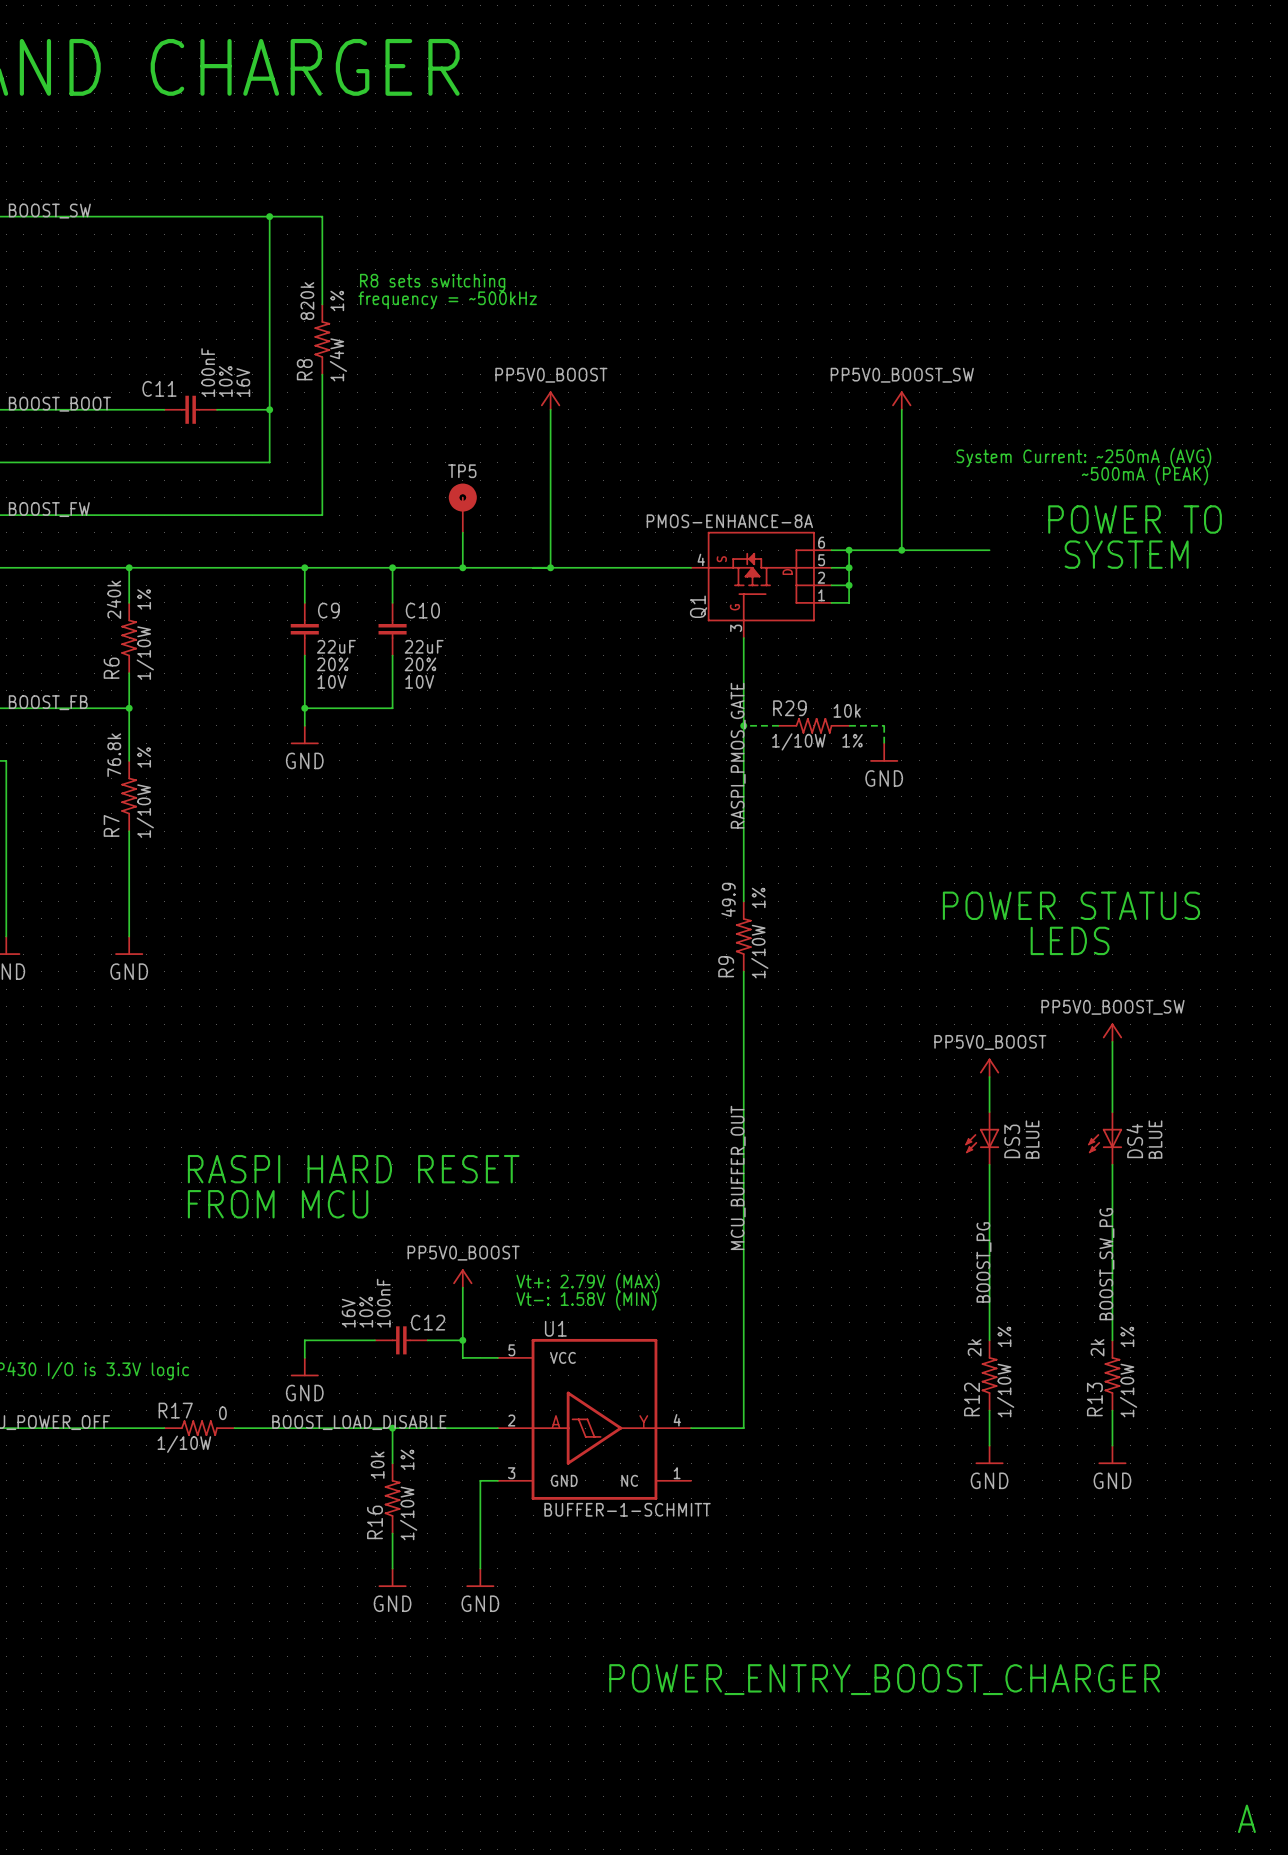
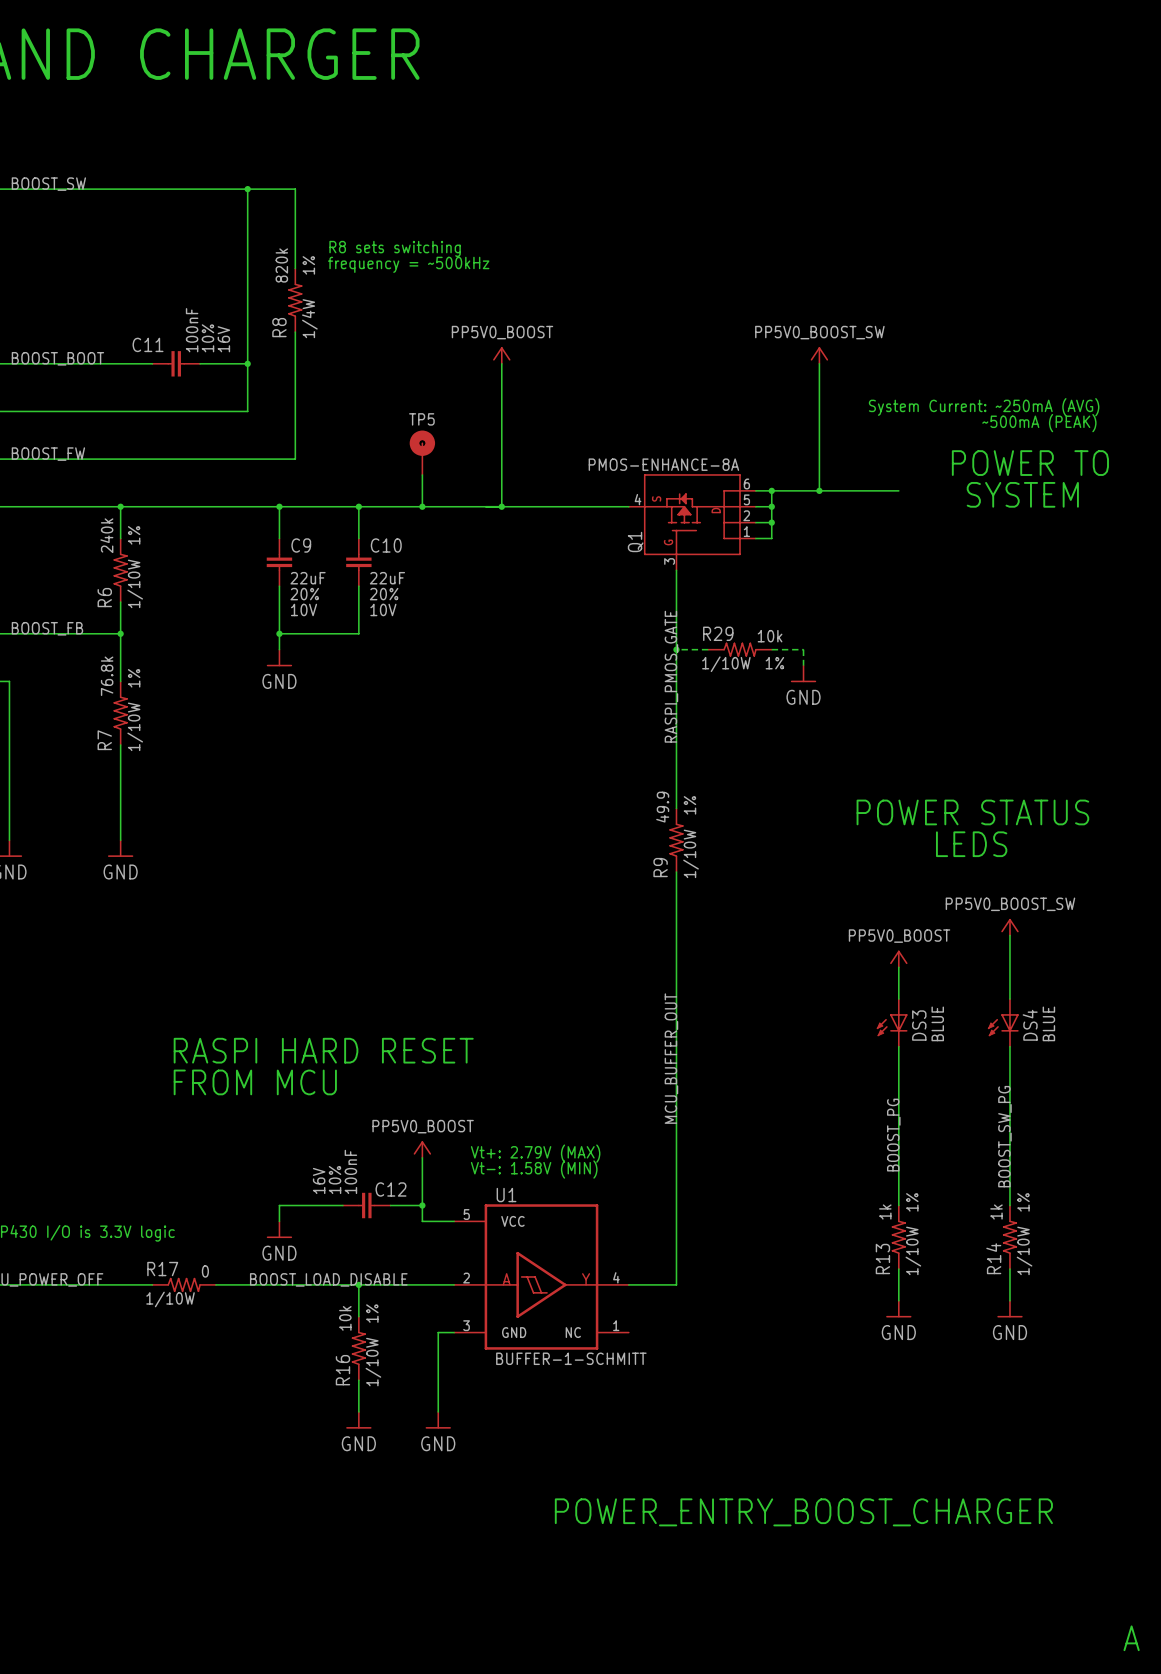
R12 value: 2k (974, 1347) -> 1k (885, 1212)
R13 value: 2k (1097, 1347) -> 1k (996, 1212)
R12 name: R12 (971, 1399) -> R13 (882, 1259)
R13 name: R13 (1094, 1399) -> R14 (993, 1258)

